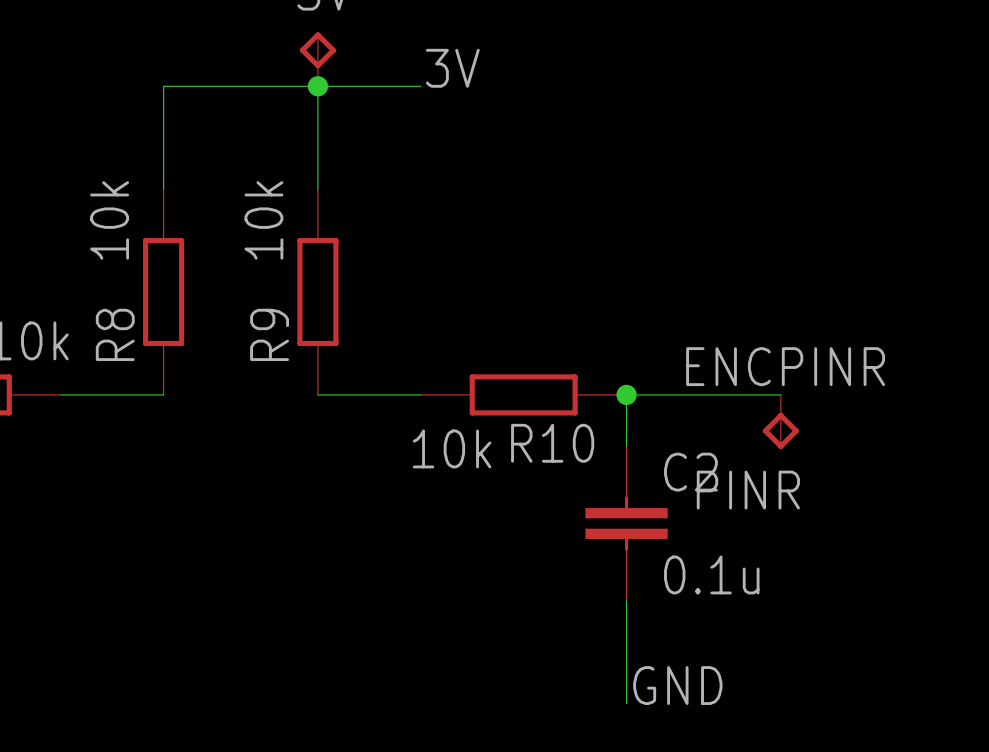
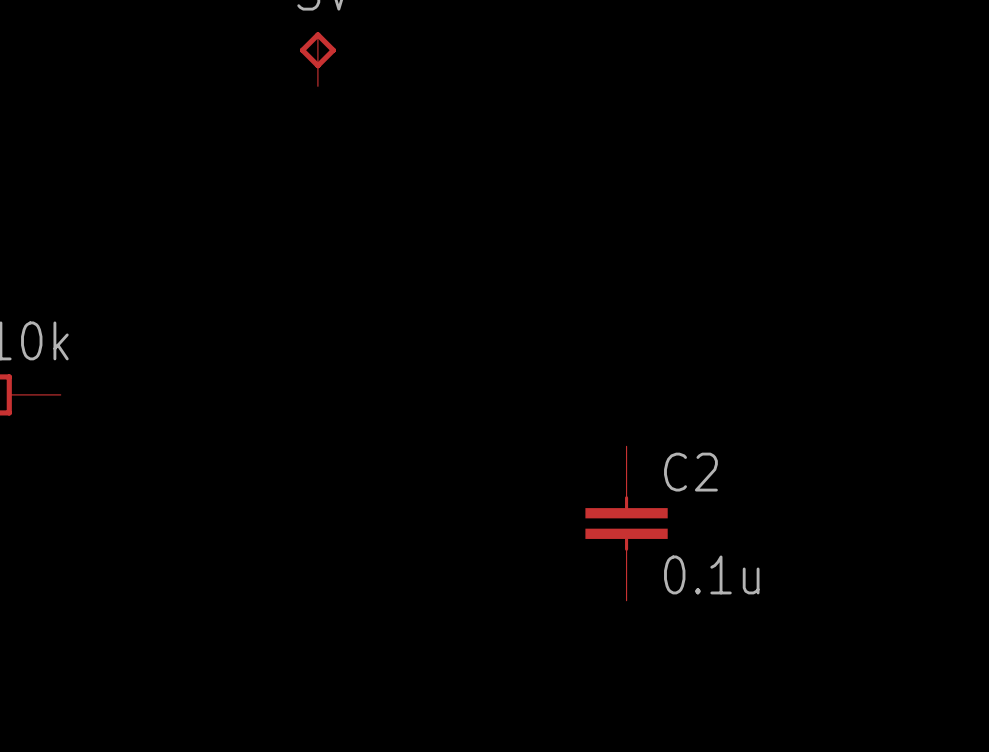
label: 3V (452, 68) -> none
wire: (317, 86) (317, 189) -> none
junction: (317, 86) -> none
wire: (420, 86) (163, 86) (163, 189) -> none
R8: 10k (163, 292) -> none
R9: 10k (317, 292) -> none
label: ENCPINR (785, 366) -> none
wire: (60, 394) (163, 394) -> none
wire: (317, 394) (420, 394) -> none
R10: 10k (523, 394) -> none
junction: (626, 394) -> none
wire: (780, 394) (626, 394) (626, 446) -> none
PINR: (780, 421) -> none
wire: (626, 600) (626, 703) -> none
label: GND (677, 685) -> none

